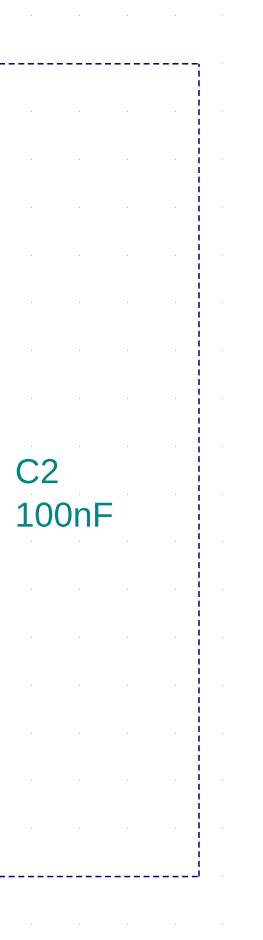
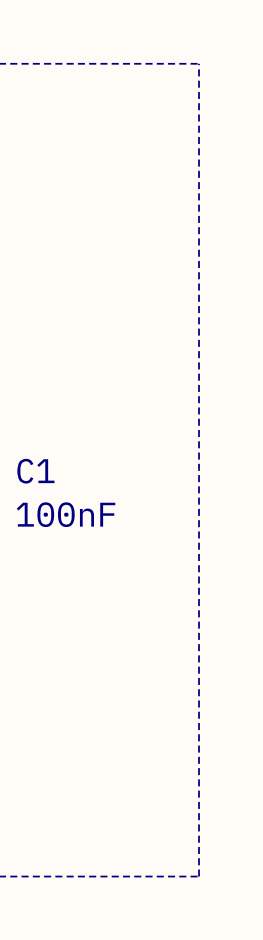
C2 name: C2 (37, 471) -> C1 (35, 471)

